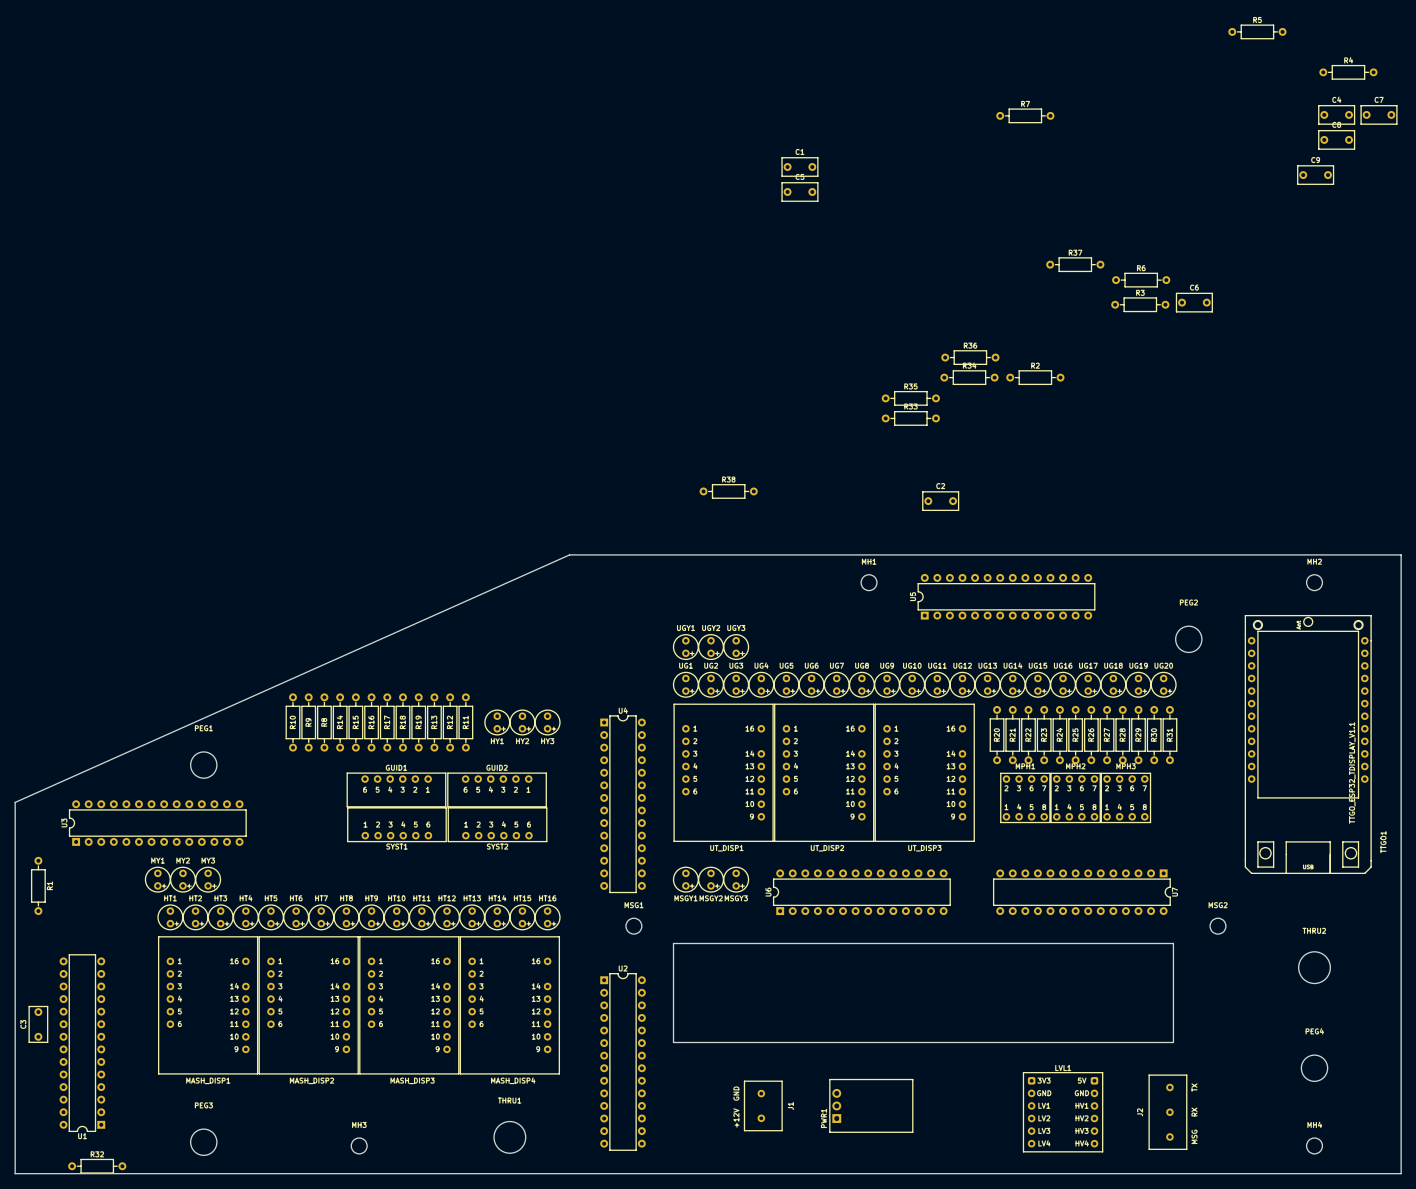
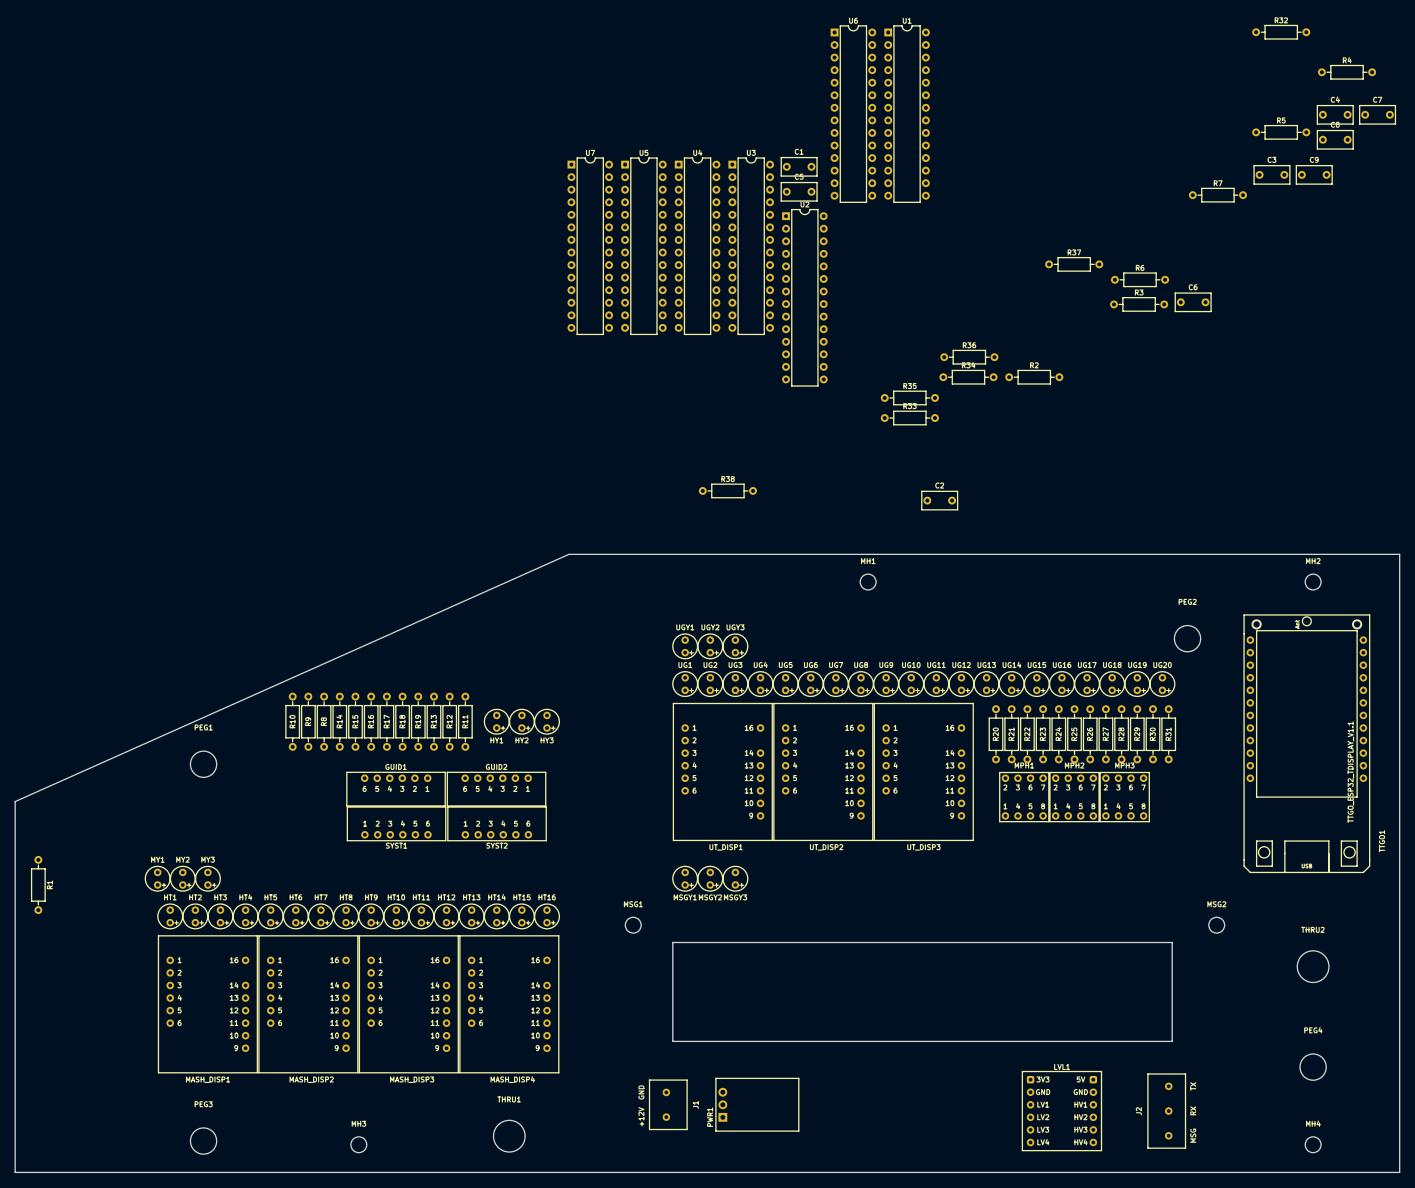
part position: (1257, 31) -> (1281, 132)
part position: (1025, 115) -> (1217, 195)
part rotation: 0° (1006, 596) -> 90° clockwise (643, 246)
part position: (1006, 596) -> (643, 246)
part position: (623, 804) -> (697, 246)
part rotation: 0° (157, 823) -> 90° clockwise (751, 246)
part position: (157, 823) -> (751, 246)
part rotation: 0° (861, 892) -> 90° clockwise (853, 114)
part position: (861, 892) -> (853, 114)
part rotation: 0° (1081, 892) -> 90° counterclockwise (590, 246)
part position: (1081, 892) -> (590, 246)
part rotation: 0° (38, 1024) -> 90° clockwise (1271, 174)
part position: (38, 1024) -> (1271, 174)
part rotation: 0° (82, 1043) -> 180° (907, 114)
part position: (82, 1043) -> (907, 114)
part position: (623, 1061) -> (804, 297)
part position: (763, 1105) -> (668, 1104)
part position: (871, 1105) -> (757, 1104)
part position: (97, 1166) -> (1281, 32)

